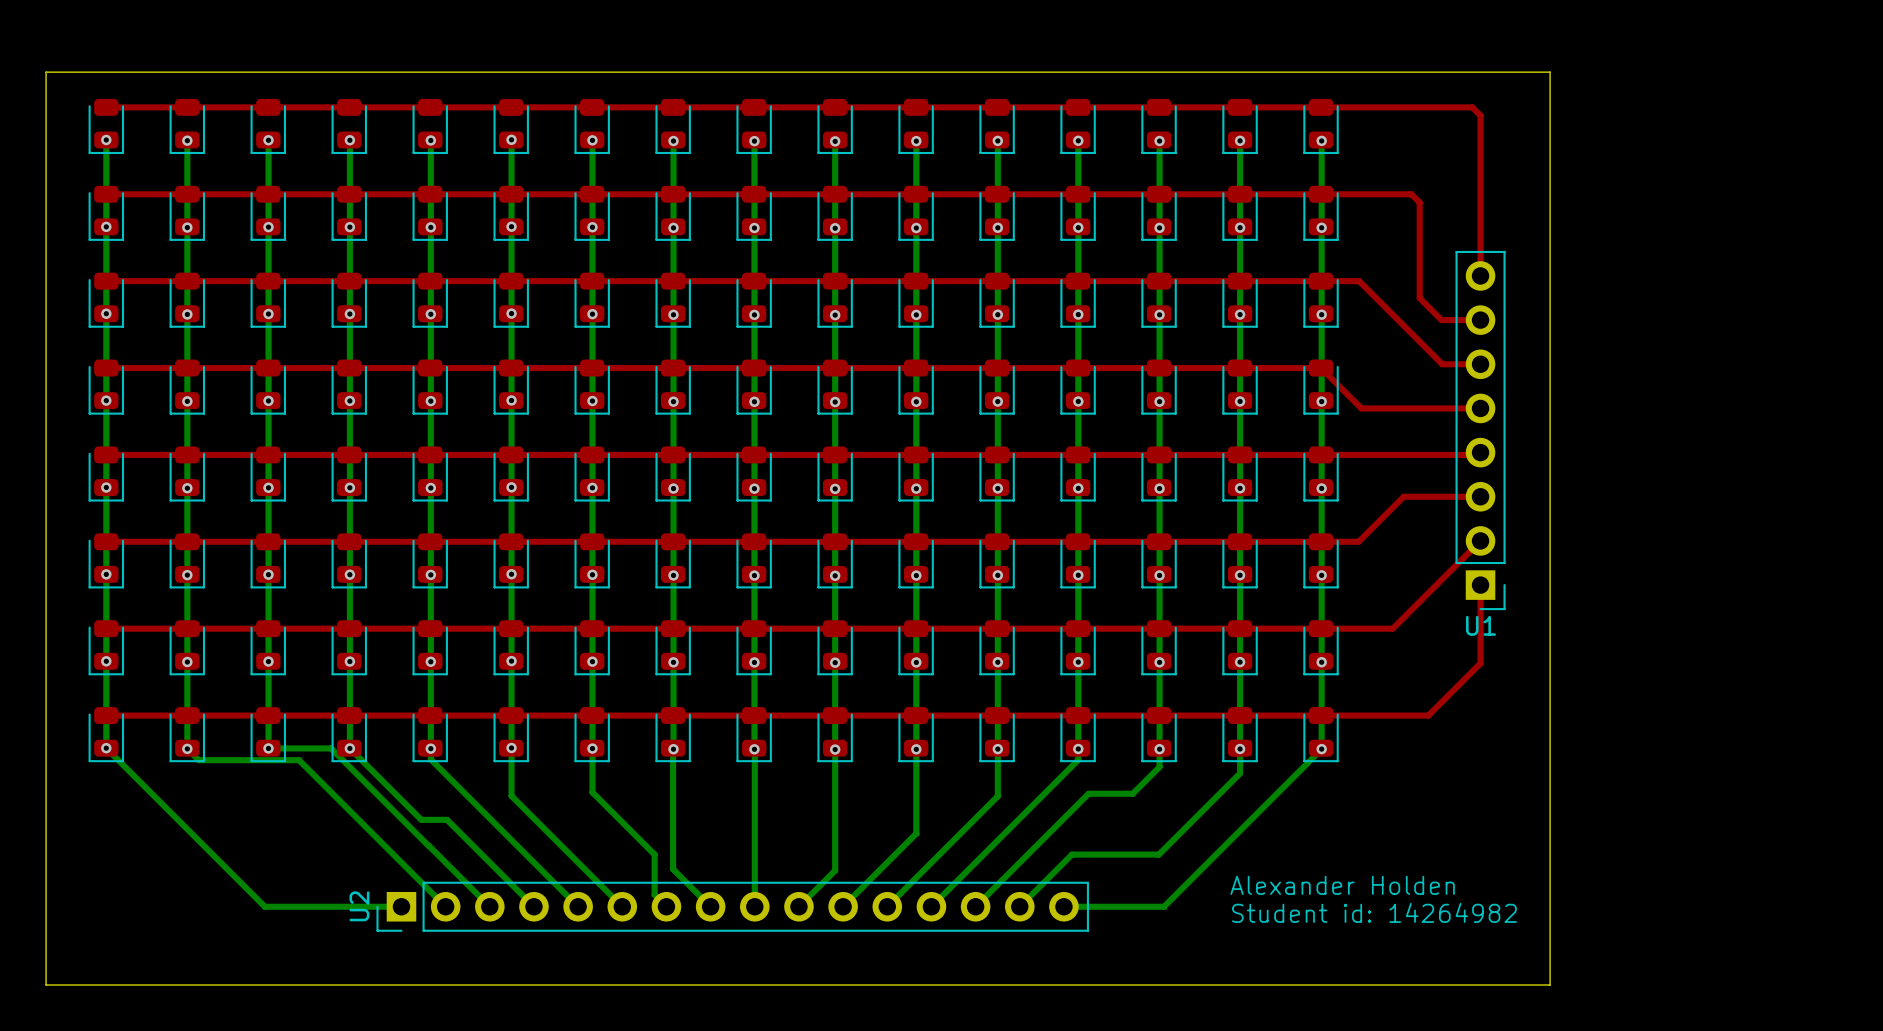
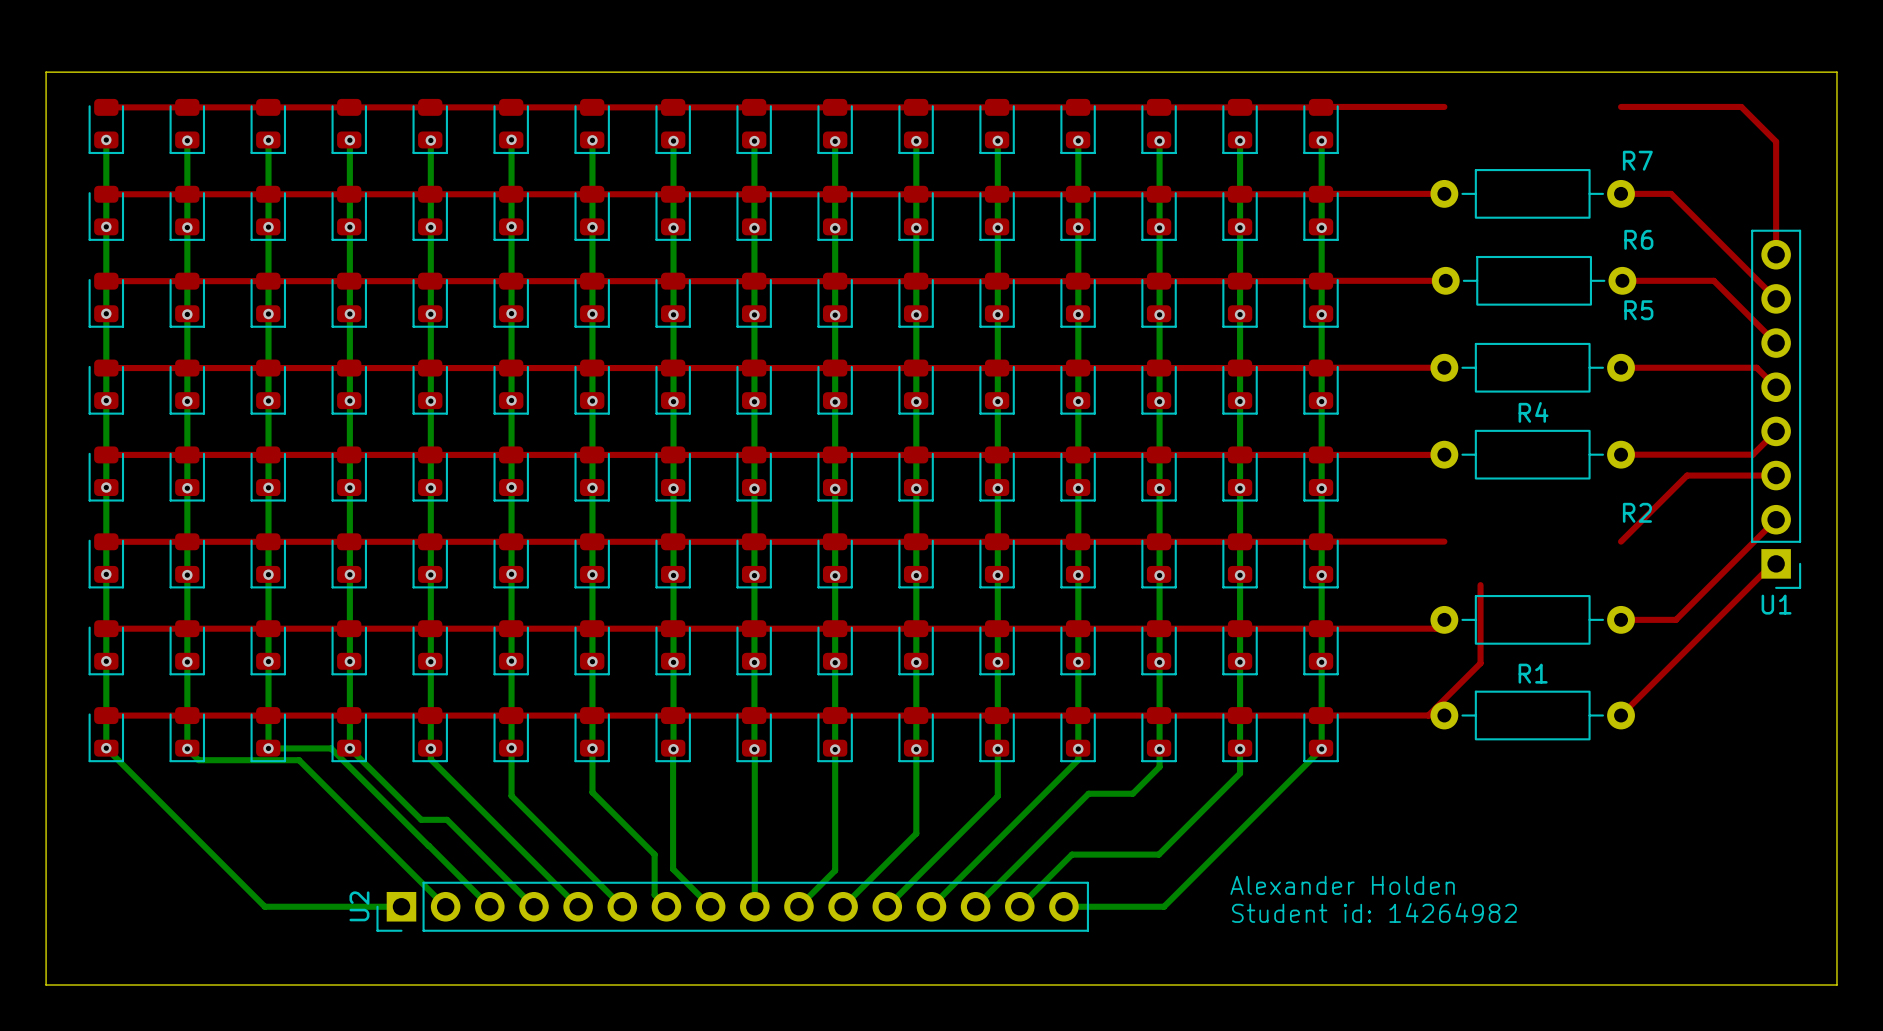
board edge: (1550, 72) (1550, 985) -> (1550, 72) (1836, 72) (1836, 985) (1550, 985)
top track: none -> (1621, 106) (1741, 106) (1776, 141) (1776, 254)
top track: (1321, 107) (1472, 107) (1480, 115) (1480, 275) -> (1321, 107) (1444, 106)
R7: none -> (1532, 193)
top track: none -> (1621, 193) (1671, 193) (1776, 298)
top track: (1332, 194) (1411, 194) (1419, 202) (1419, 298) (1441, 320) (1480, 320) -> (1332, 194) (1444, 193)
R6: none -> (1534, 280)
top track: none -> (1622, 280) (1713, 280) (1776, 343)
top track: (1321, 281) (1359, 281) (1442, 364) (1480, 364) -> (1321, 281) (1445, 280)
R5: none -> (1532, 367)
top track: none -> (1621, 367) (1756, 367) (1776, 387)
top track: (1321, 368) (1361, 408) (1480, 408) -> (1321, 368) (1444, 367)
U1 position: (1480, 430) -> (1776, 409)
top track: none -> (1776, 431) (1752, 454) (1621, 454)
top track: (1480, 452) (1478, 454) (1444, 454) -> none
R4: none -> (1532, 454)
top track: none -> (1776, 475) (1687, 475) (1621, 541)
top track: (1480, 496) (1403, 496) (1358, 541) (1321, 541) -> (1444, 541) (1321, 541)
top track: none -> (1776, 519) (1675, 619) (1621, 619)
top track: (1480, 540) (1392, 628) -> (1444, 619) (1435, 628) (1392, 628)
top track: none -> (1776, 563) (1772, 563) (1621, 715)
R2: none -> (1532, 619)
R1: none -> (1532, 715)

